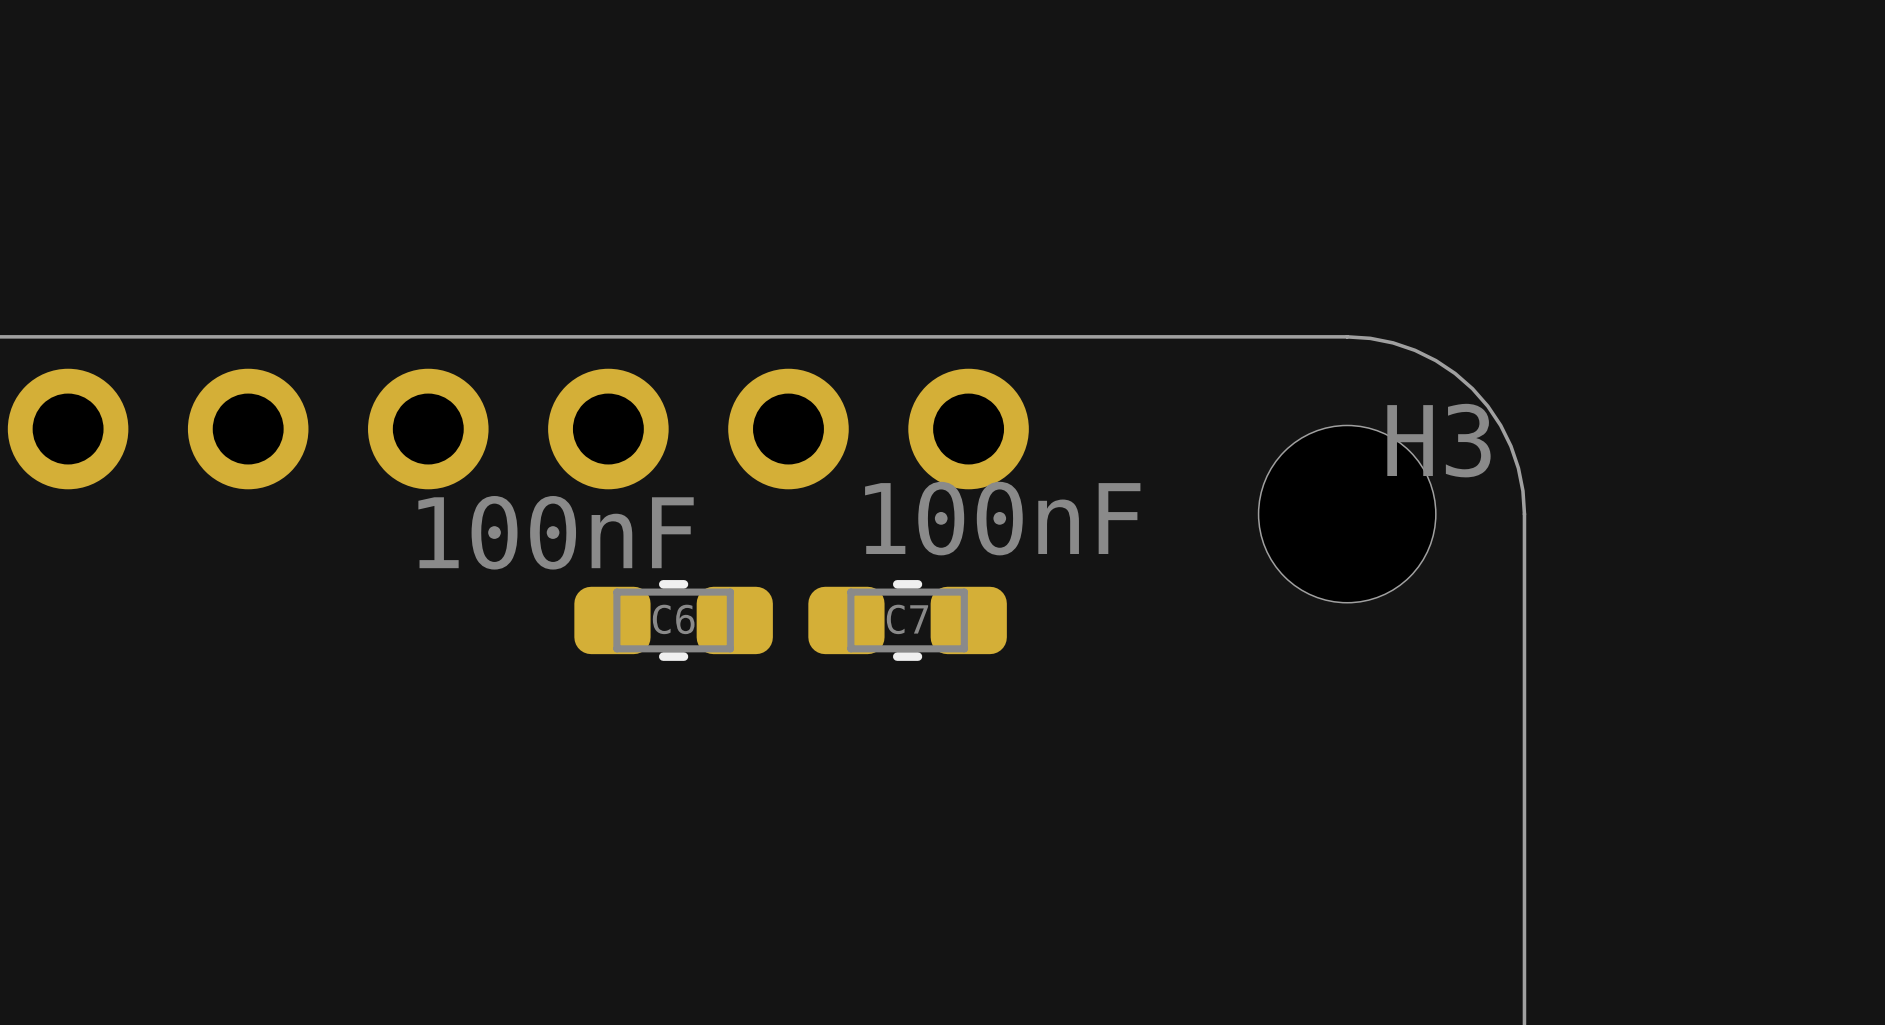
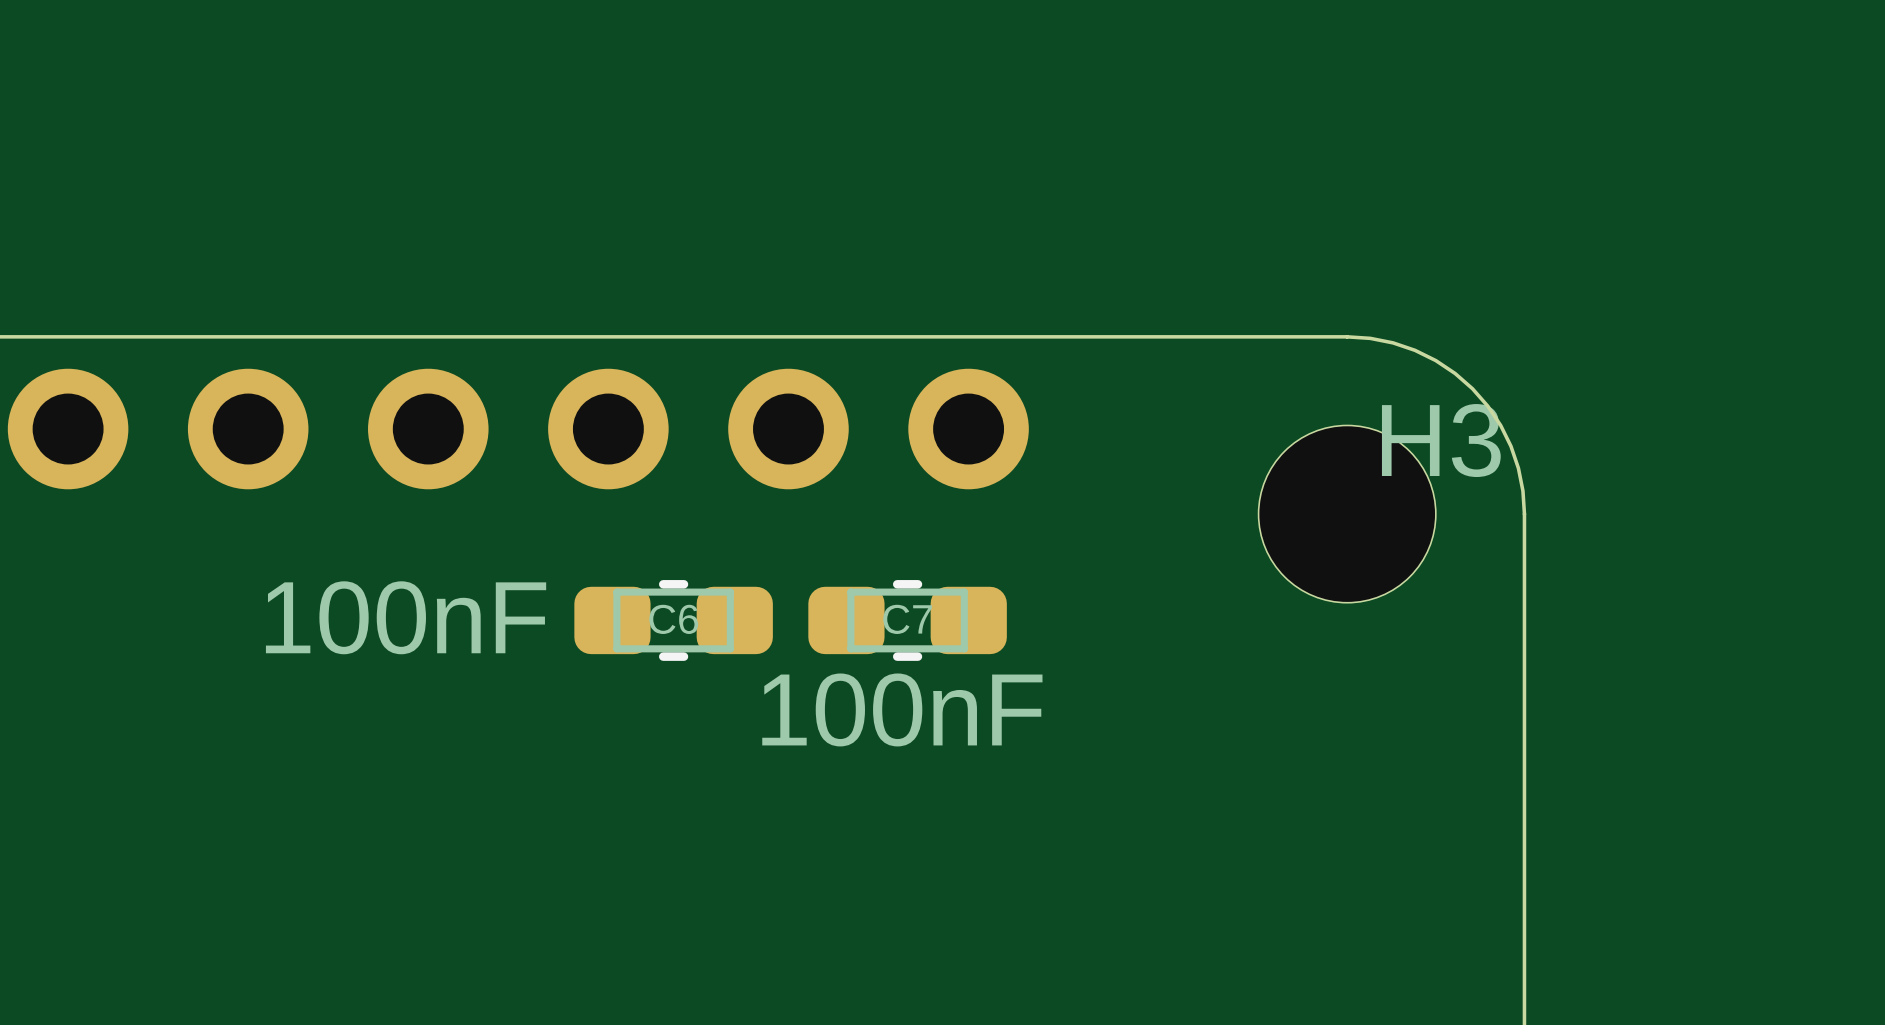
C7 value position: 100nF (1002, 518) -> 100nF (902, 709)
C6 value position: 100nF (556, 532) -> 100nF (406, 617)

